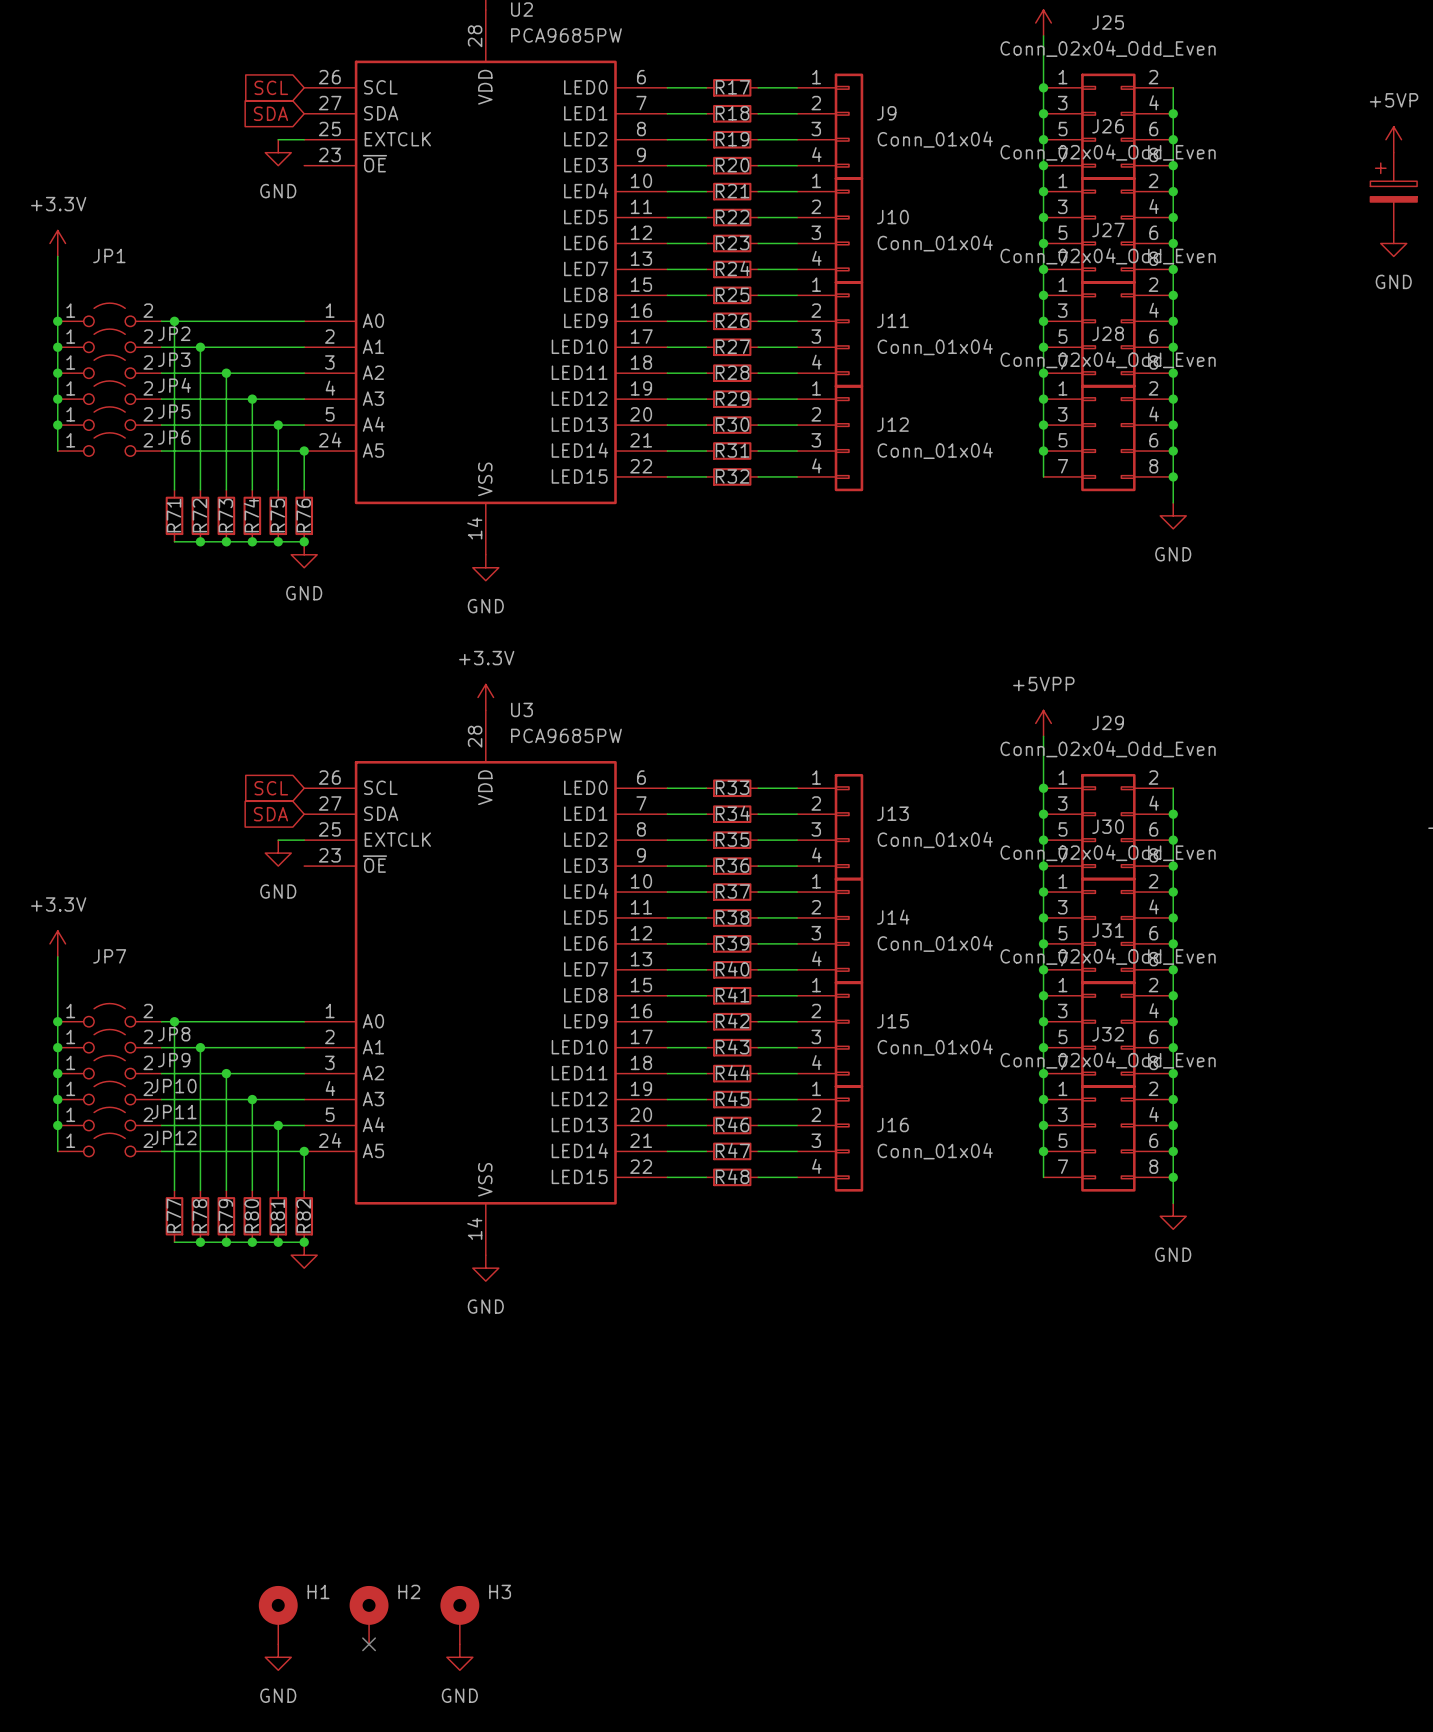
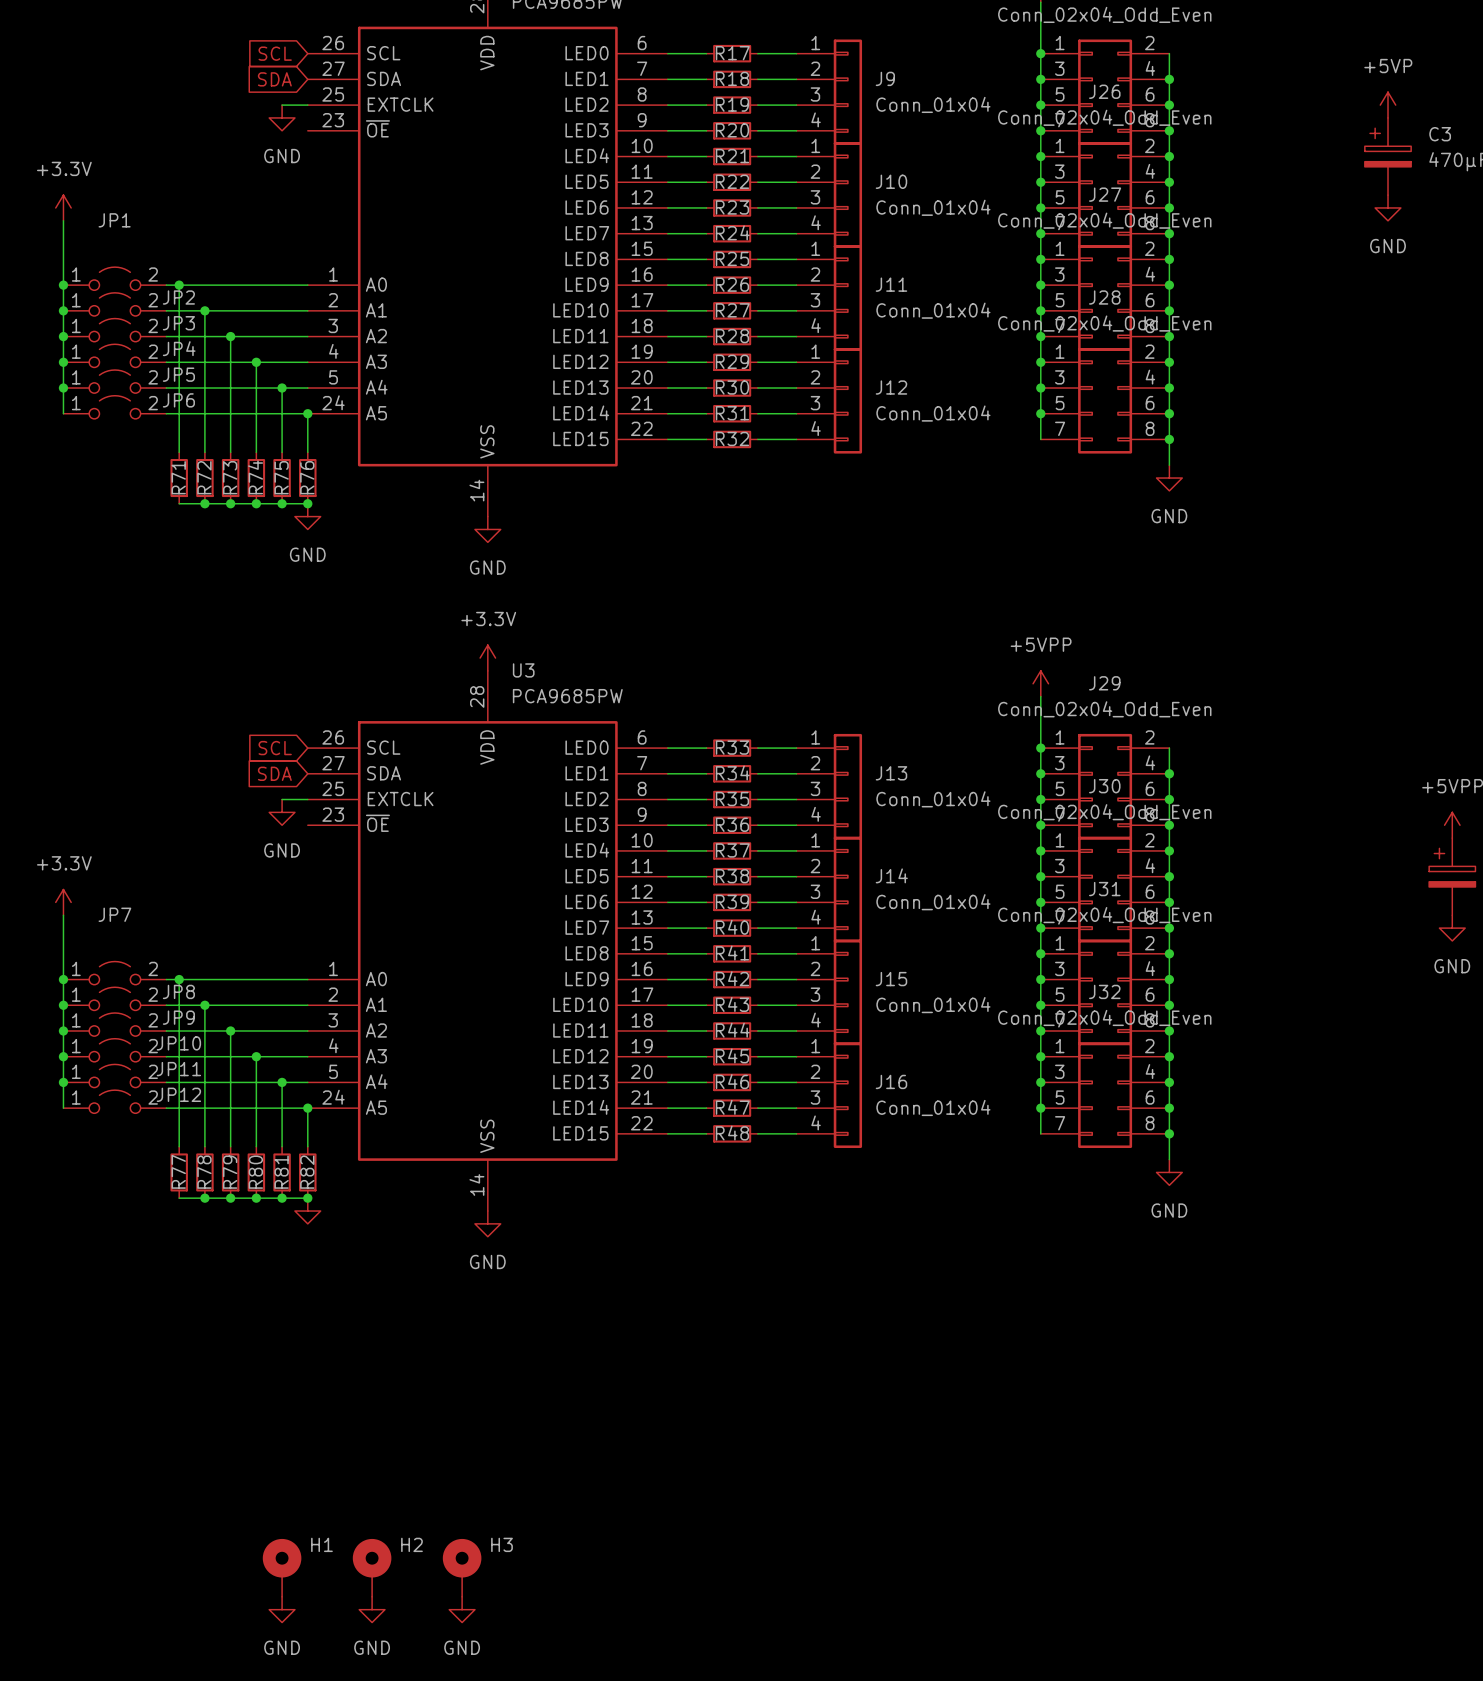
no-connect mark: (369, 1644) -> none
power symbol: none -> GND (372, 1609)

